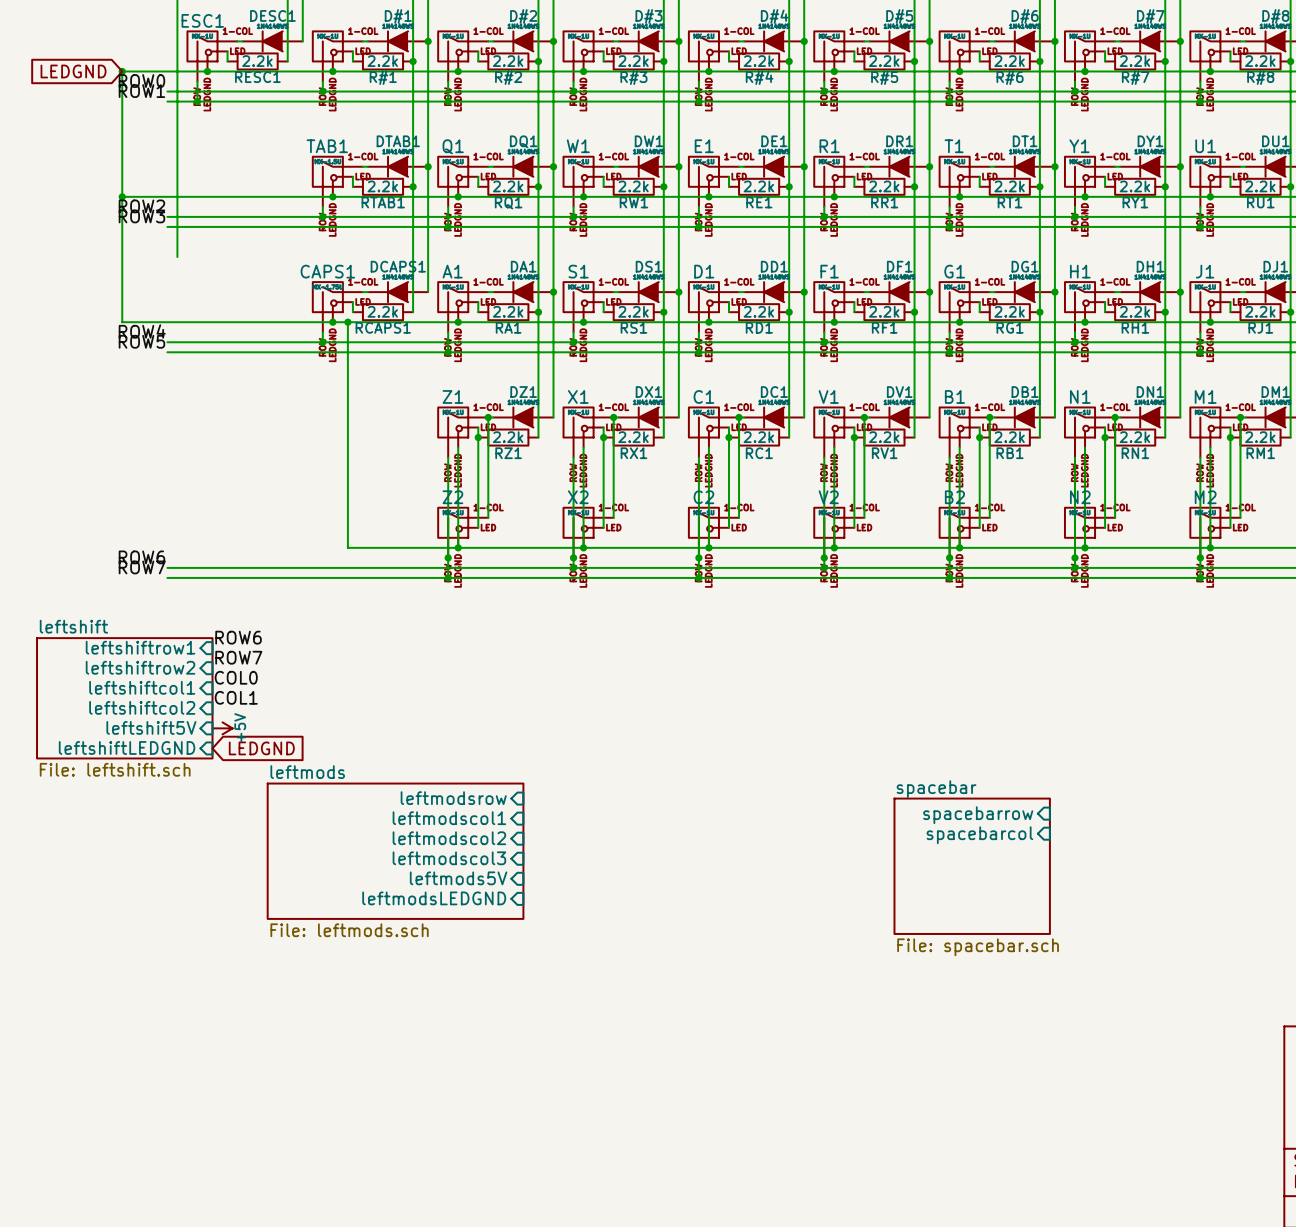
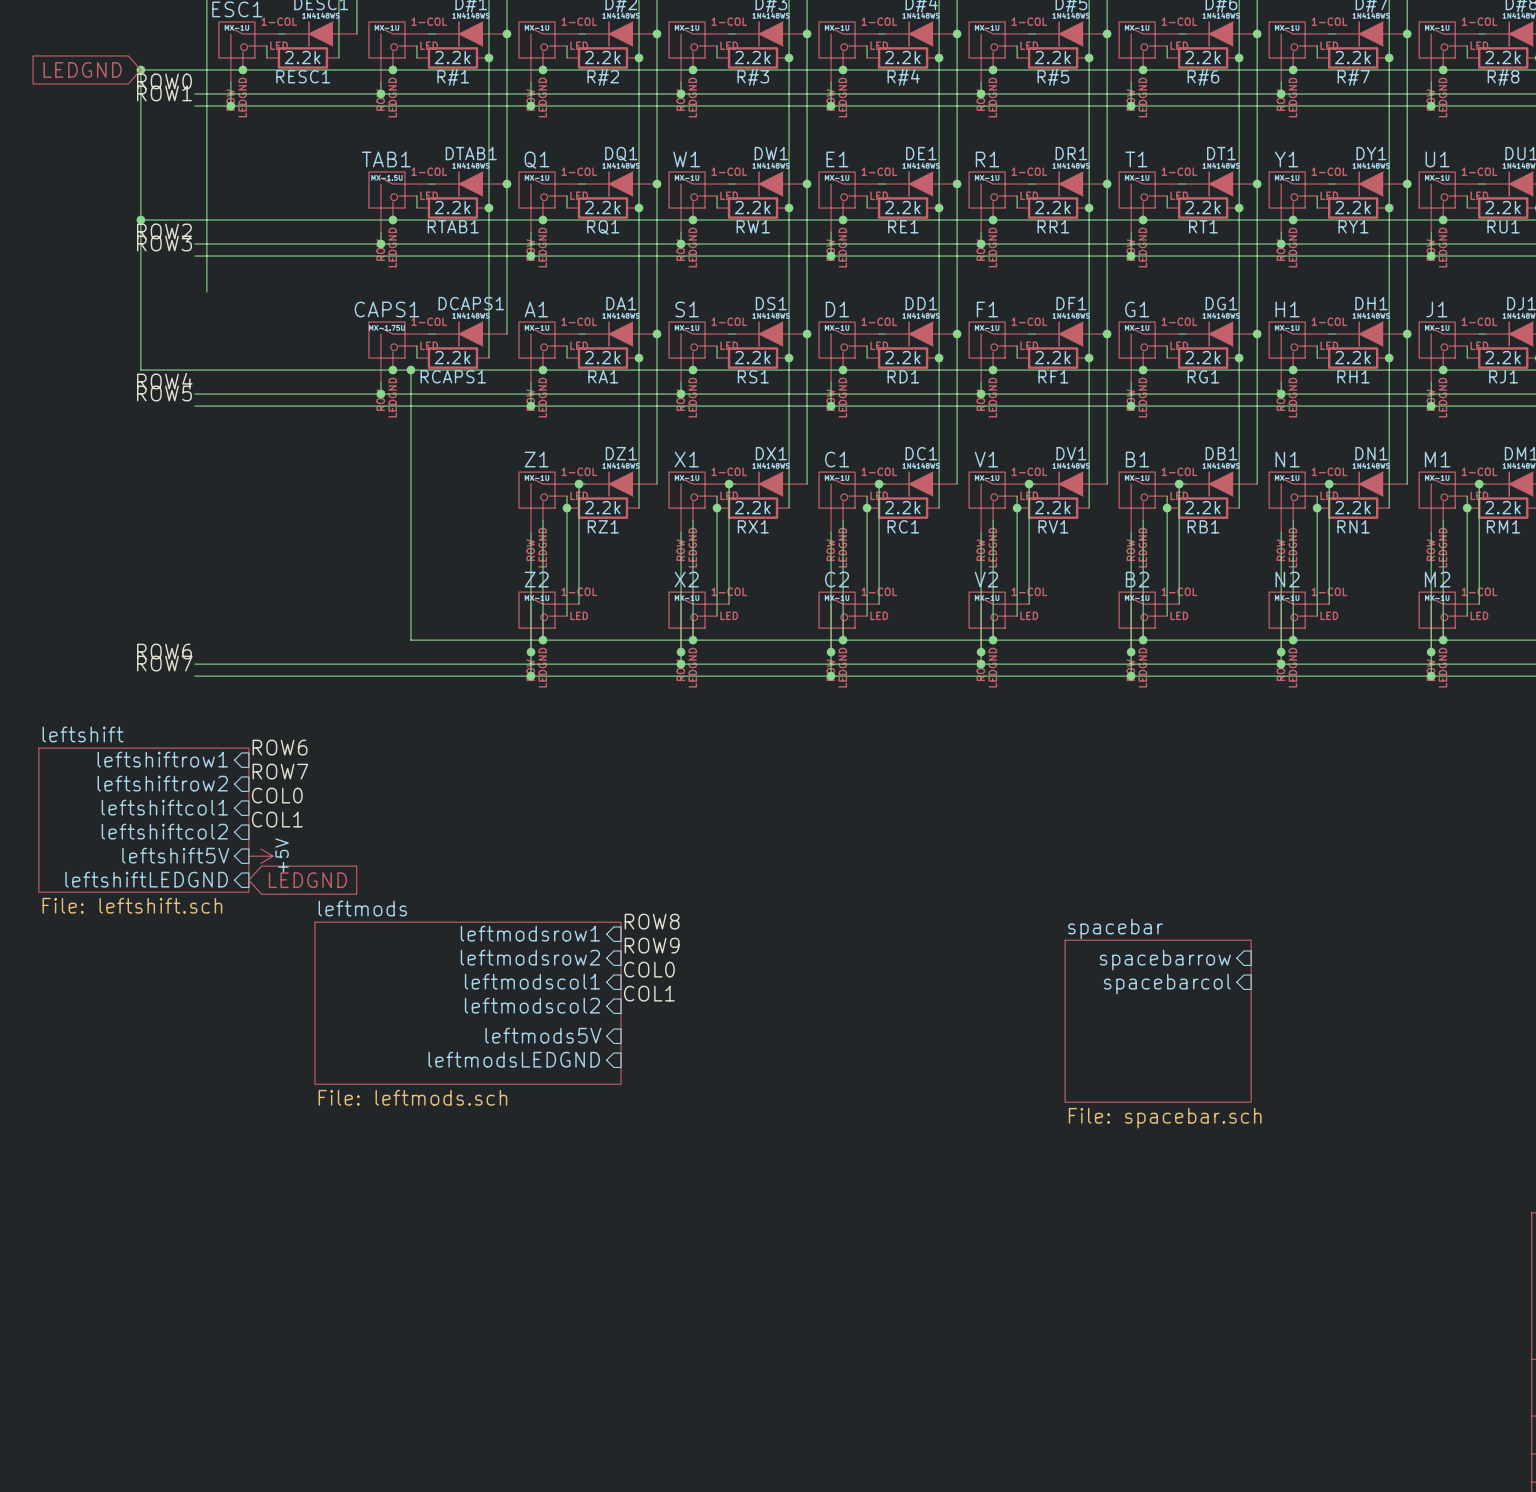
label: none -> ROW8 (652, 921)
sheet pin: leftmodsrow (453, 798) -> leftmodsrow1 (530, 933)
label: none -> ROW9 (652, 945)
sheet pin: leftmodscol1 (449, 818) -> leftmodsrow2 (530, 957)
label: none -> COL0 (649, 969)
sheet pin: leftmodscol2 (449, 838) -> leftmodscol1 (532, 981)
label: none -> COL1 (649, 993)
sheet pin: leftmodscol3 (449, 858) -> leftmodscol2 (532, 1005)

